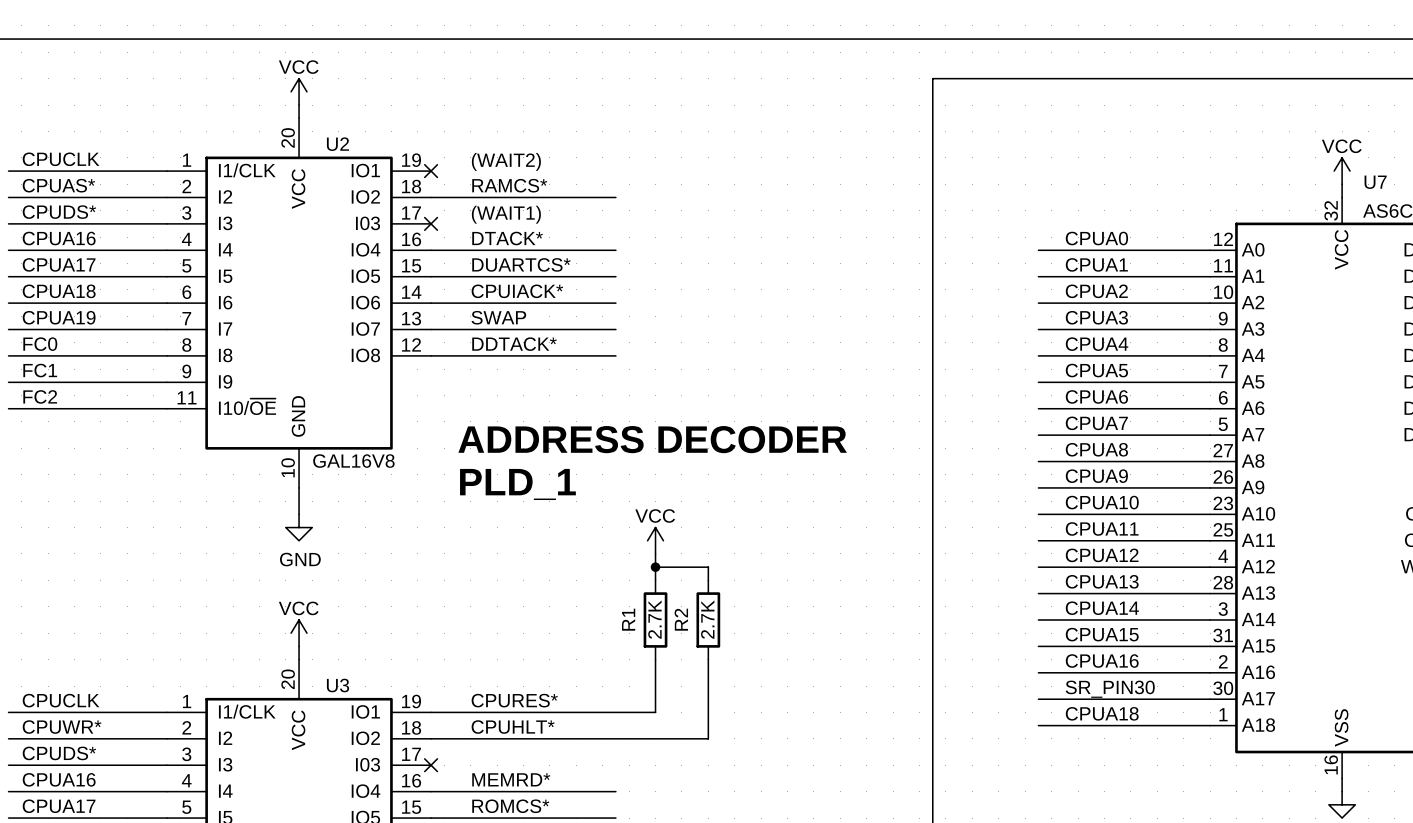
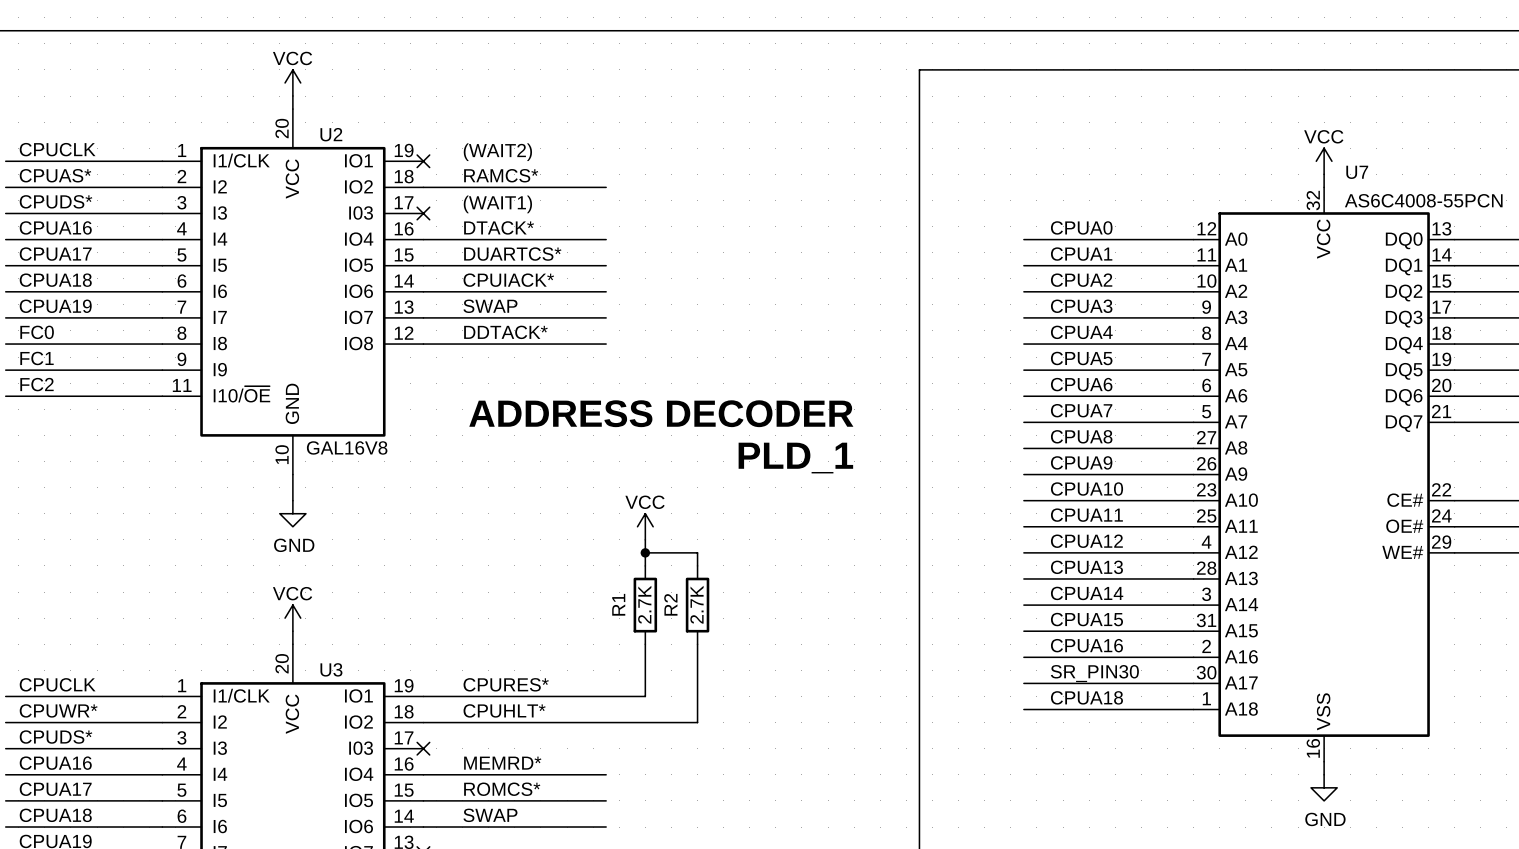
text: none -> ADDRESS DECODER (661, 413)
text: ADDRESS DECODER (652, 439) -> none
text: none -> PLD_1 (795, 458)
text: PLD_1 (517, 484) -> none

